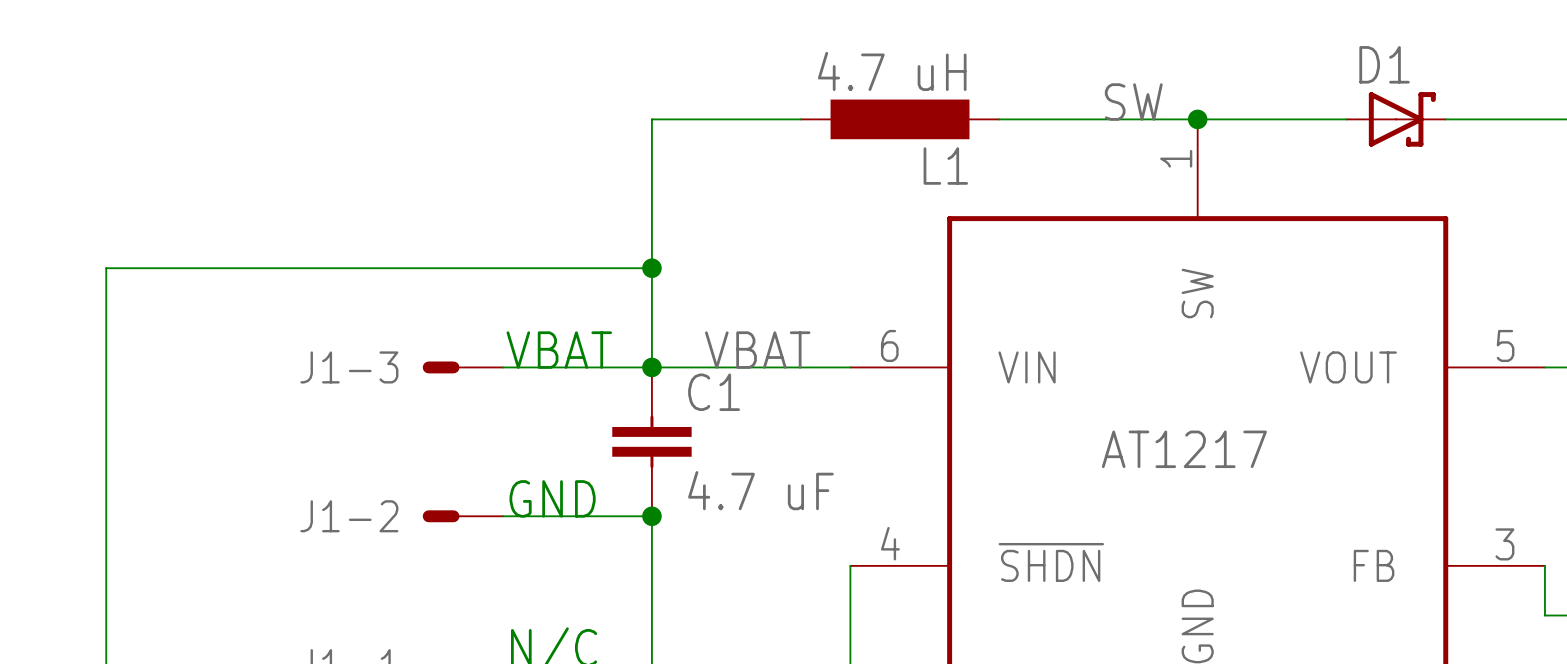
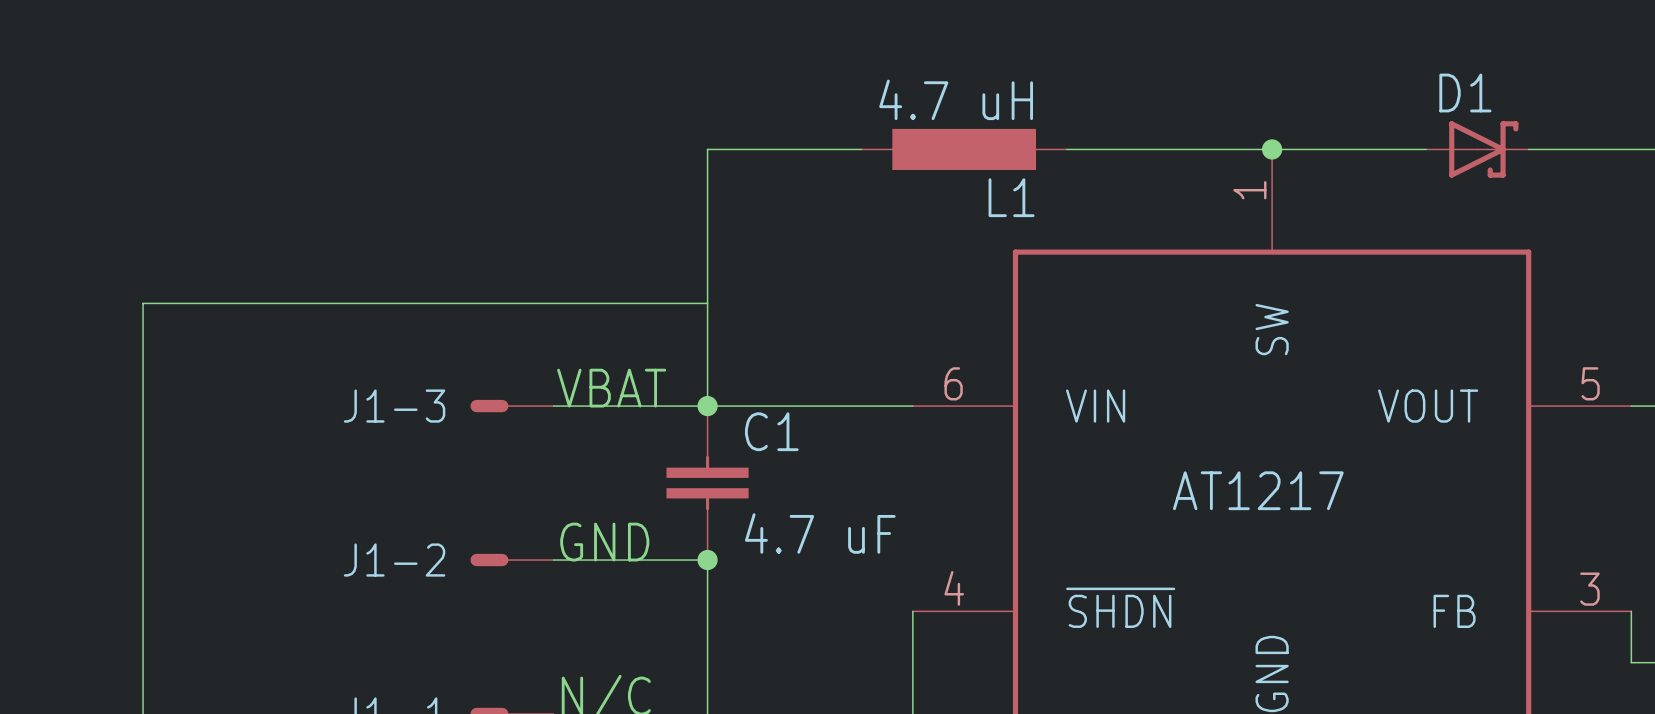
label: SW (1133, 102) -> none
junction: (651, 268) -> none
label: VBAT (757, 350) -> none

